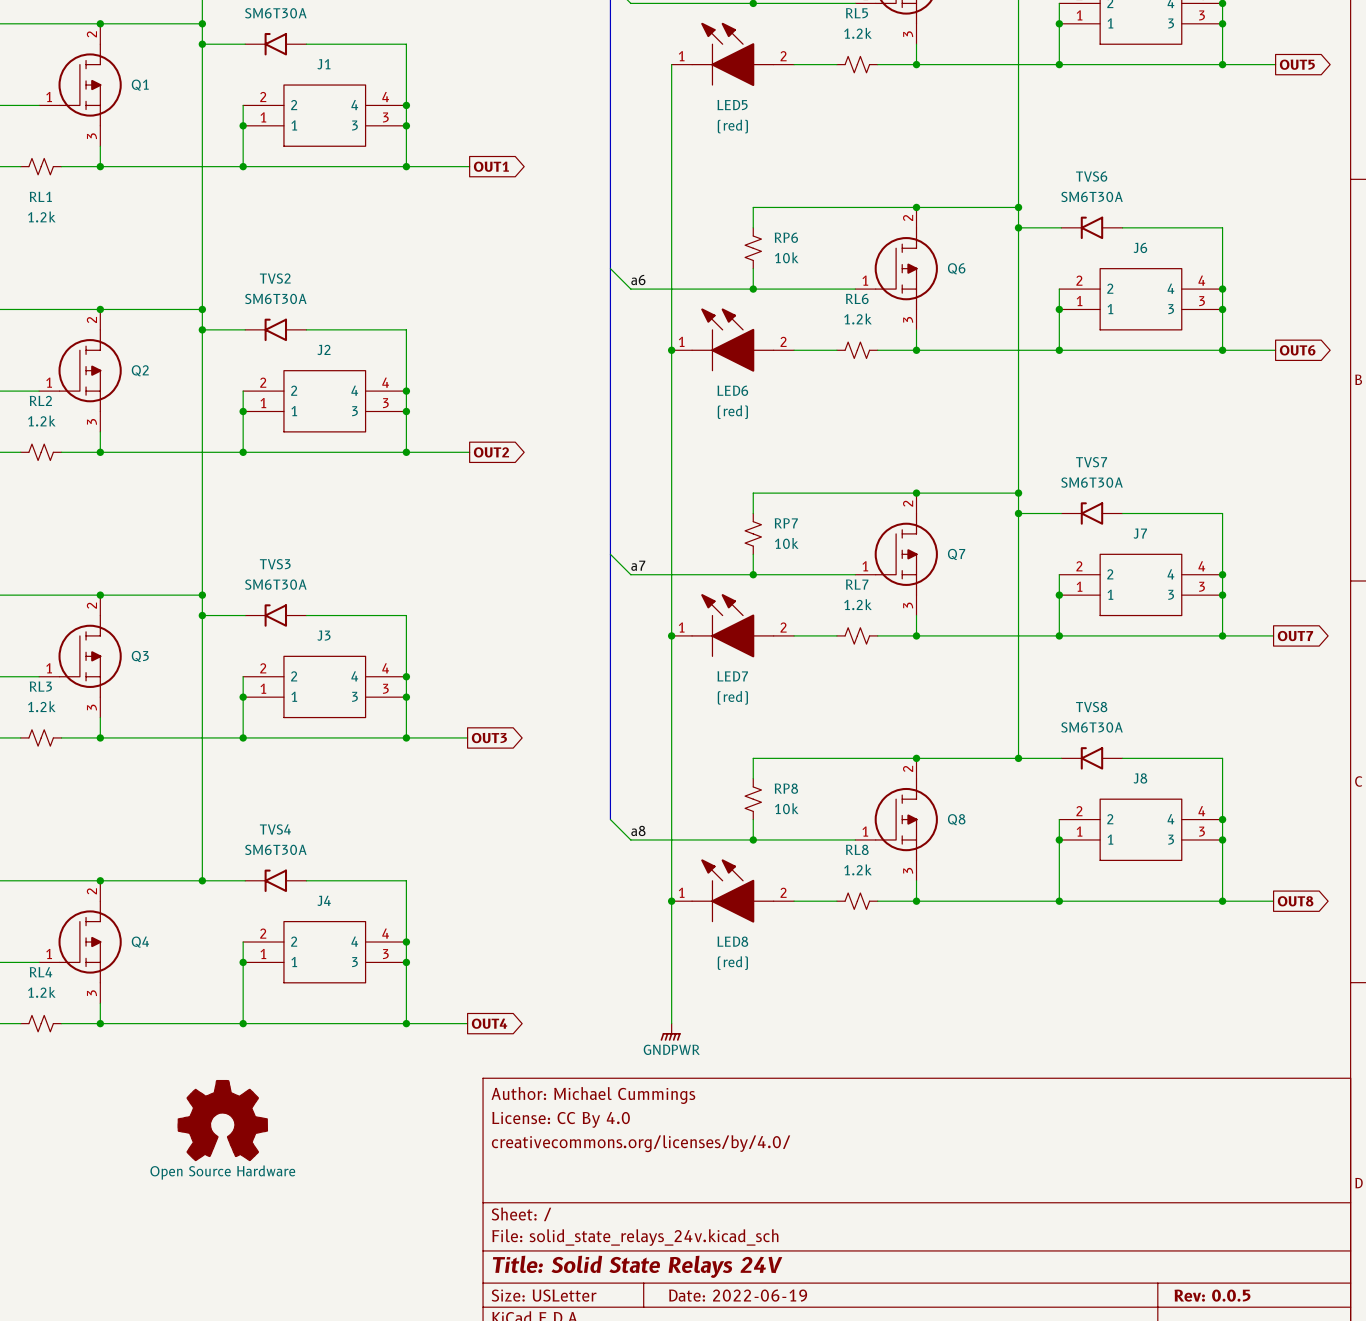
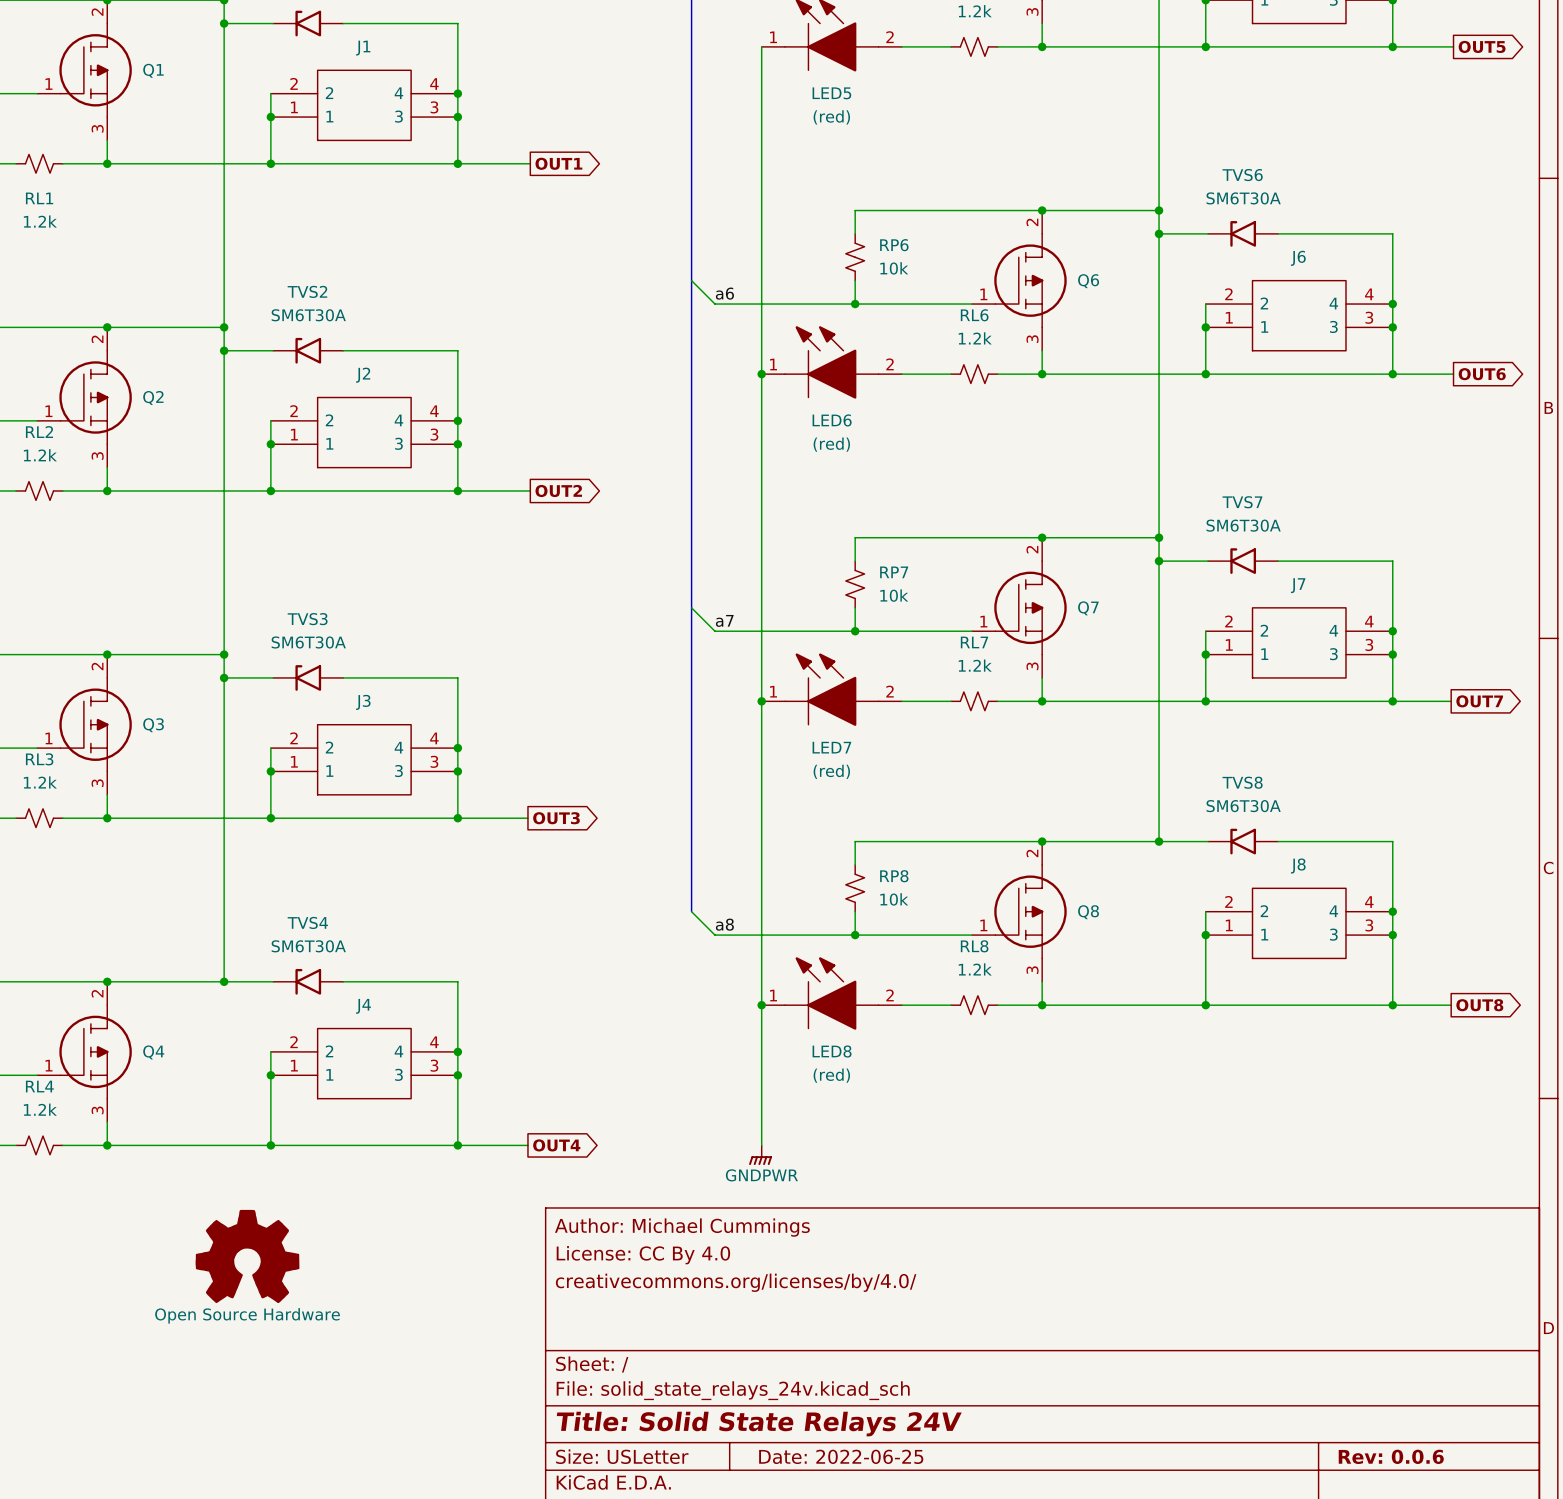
title block: Date: 2022-06-19 (738, 1295) -> Date: 2022-06-25 (841, 1456)
title block: Rev: 0.0.5 (1212, 1295) -> Rev: 0.0.6 (1391, 1456)

